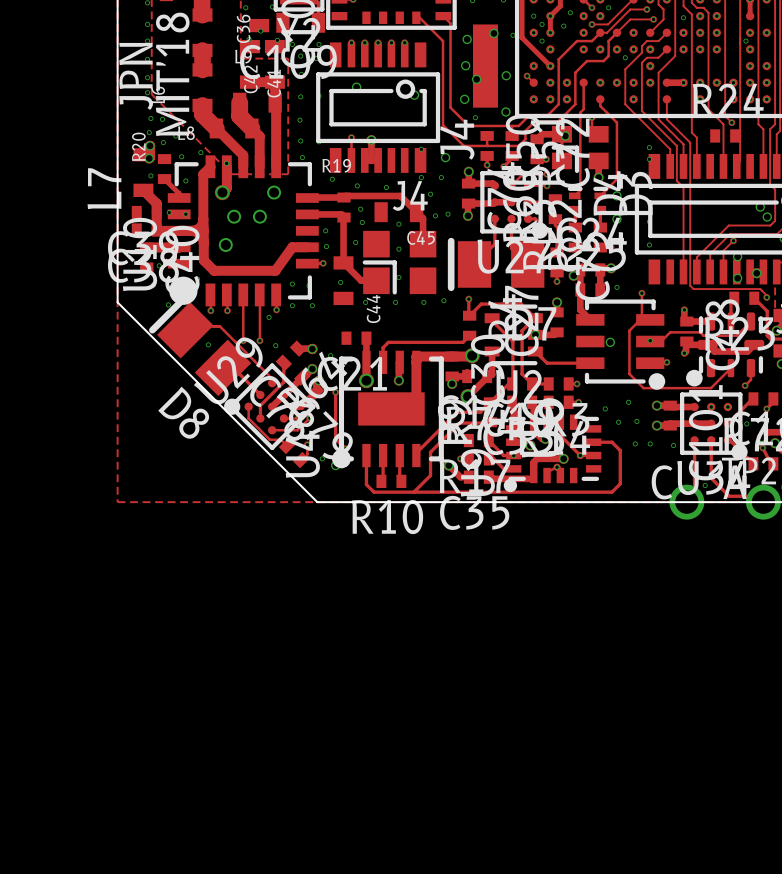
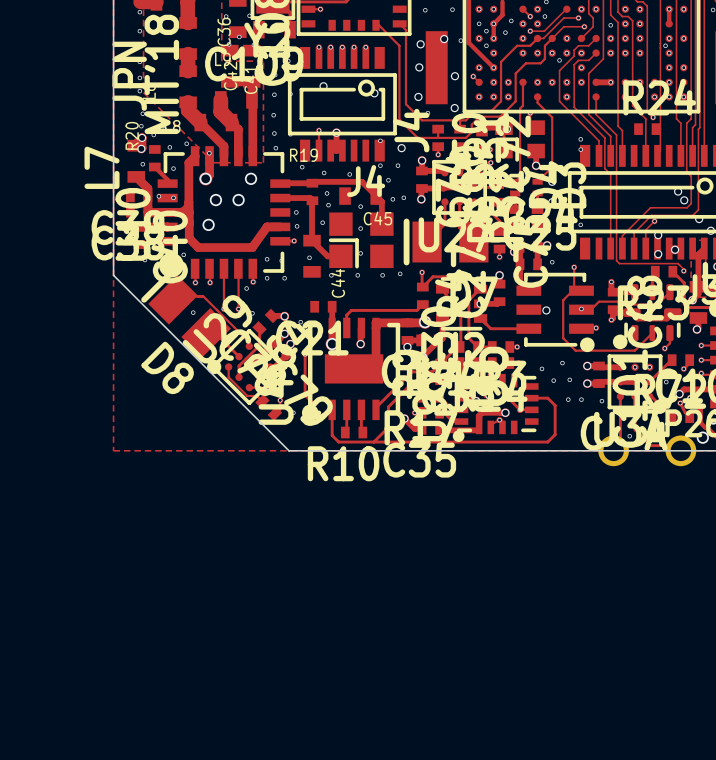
via: (476, 79) -> none

